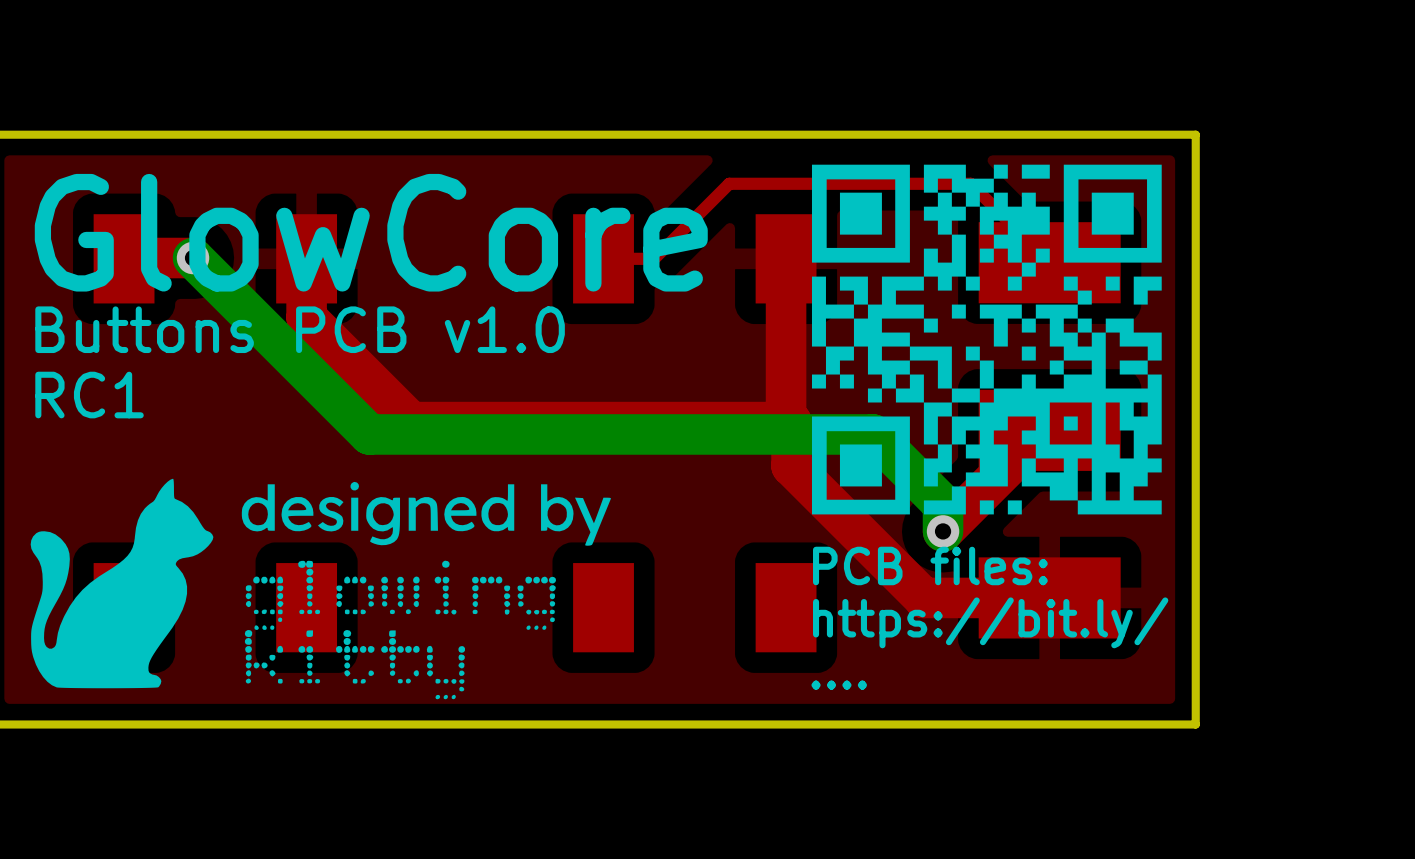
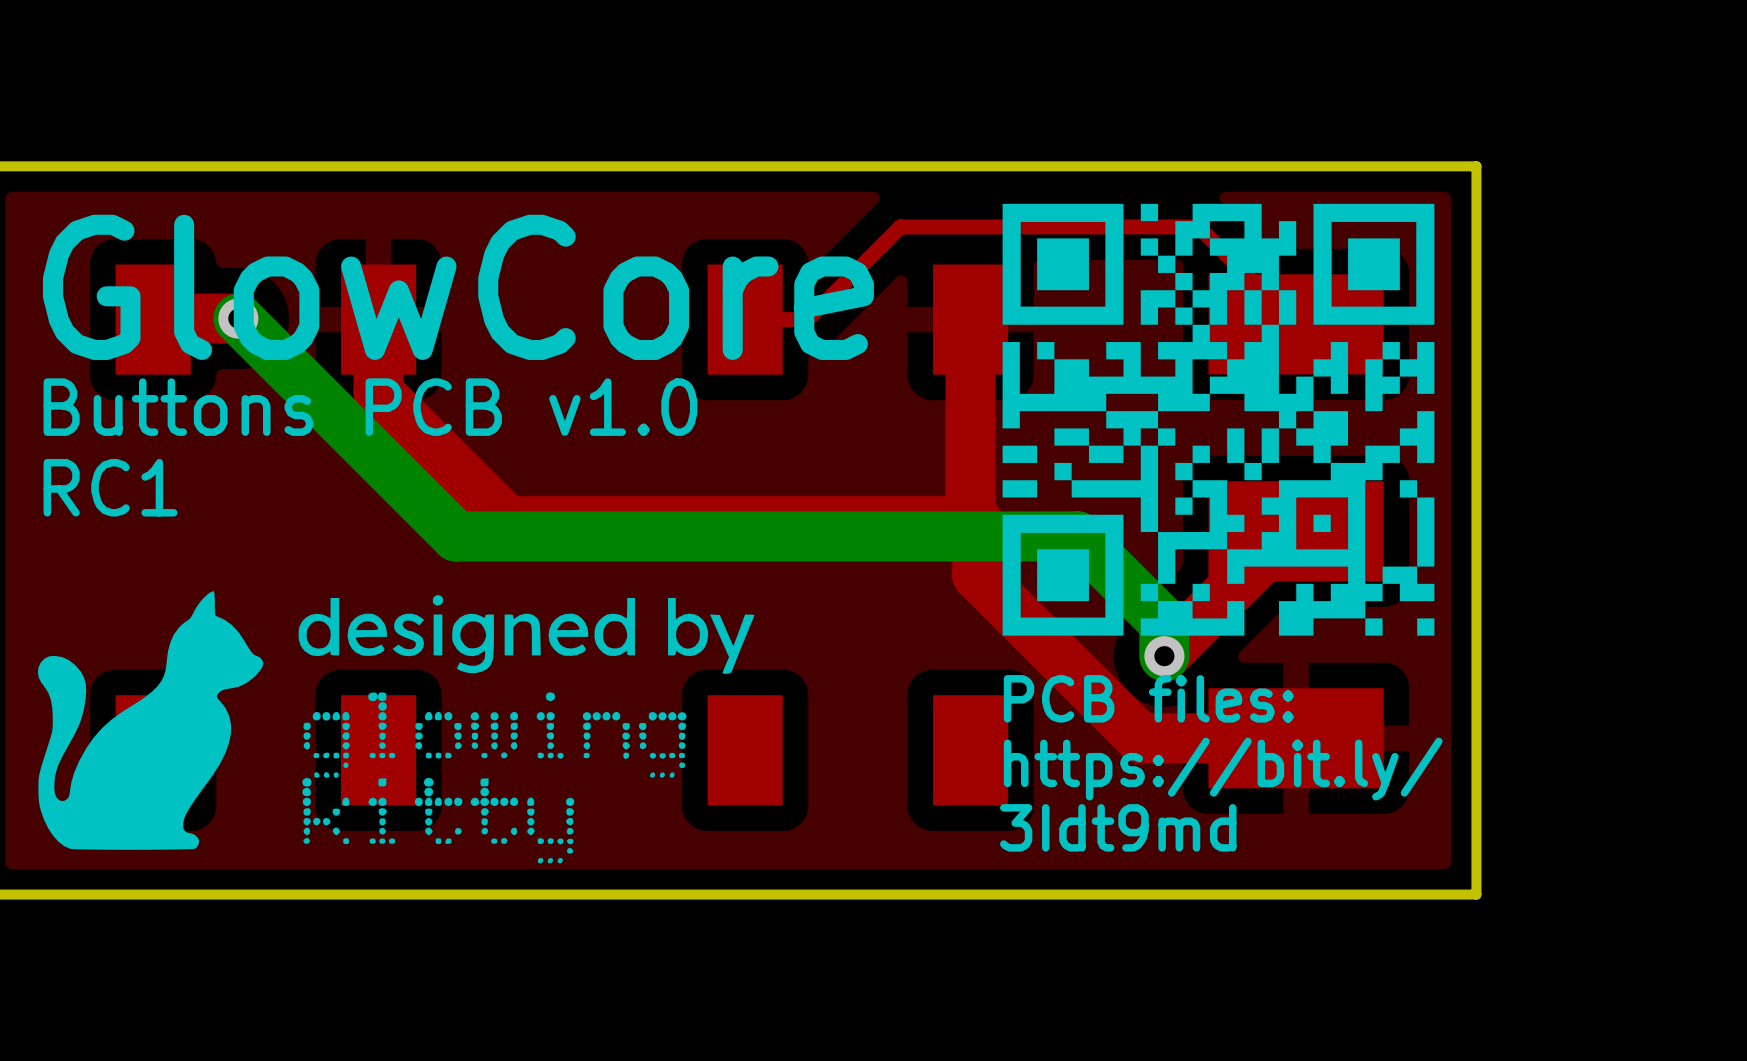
drawing shape: [811, 164, 1162, 515] -> [1002, 203, 1435, 636]
text: .... (839, 685) -> 3Idt9md (1118, 827)

